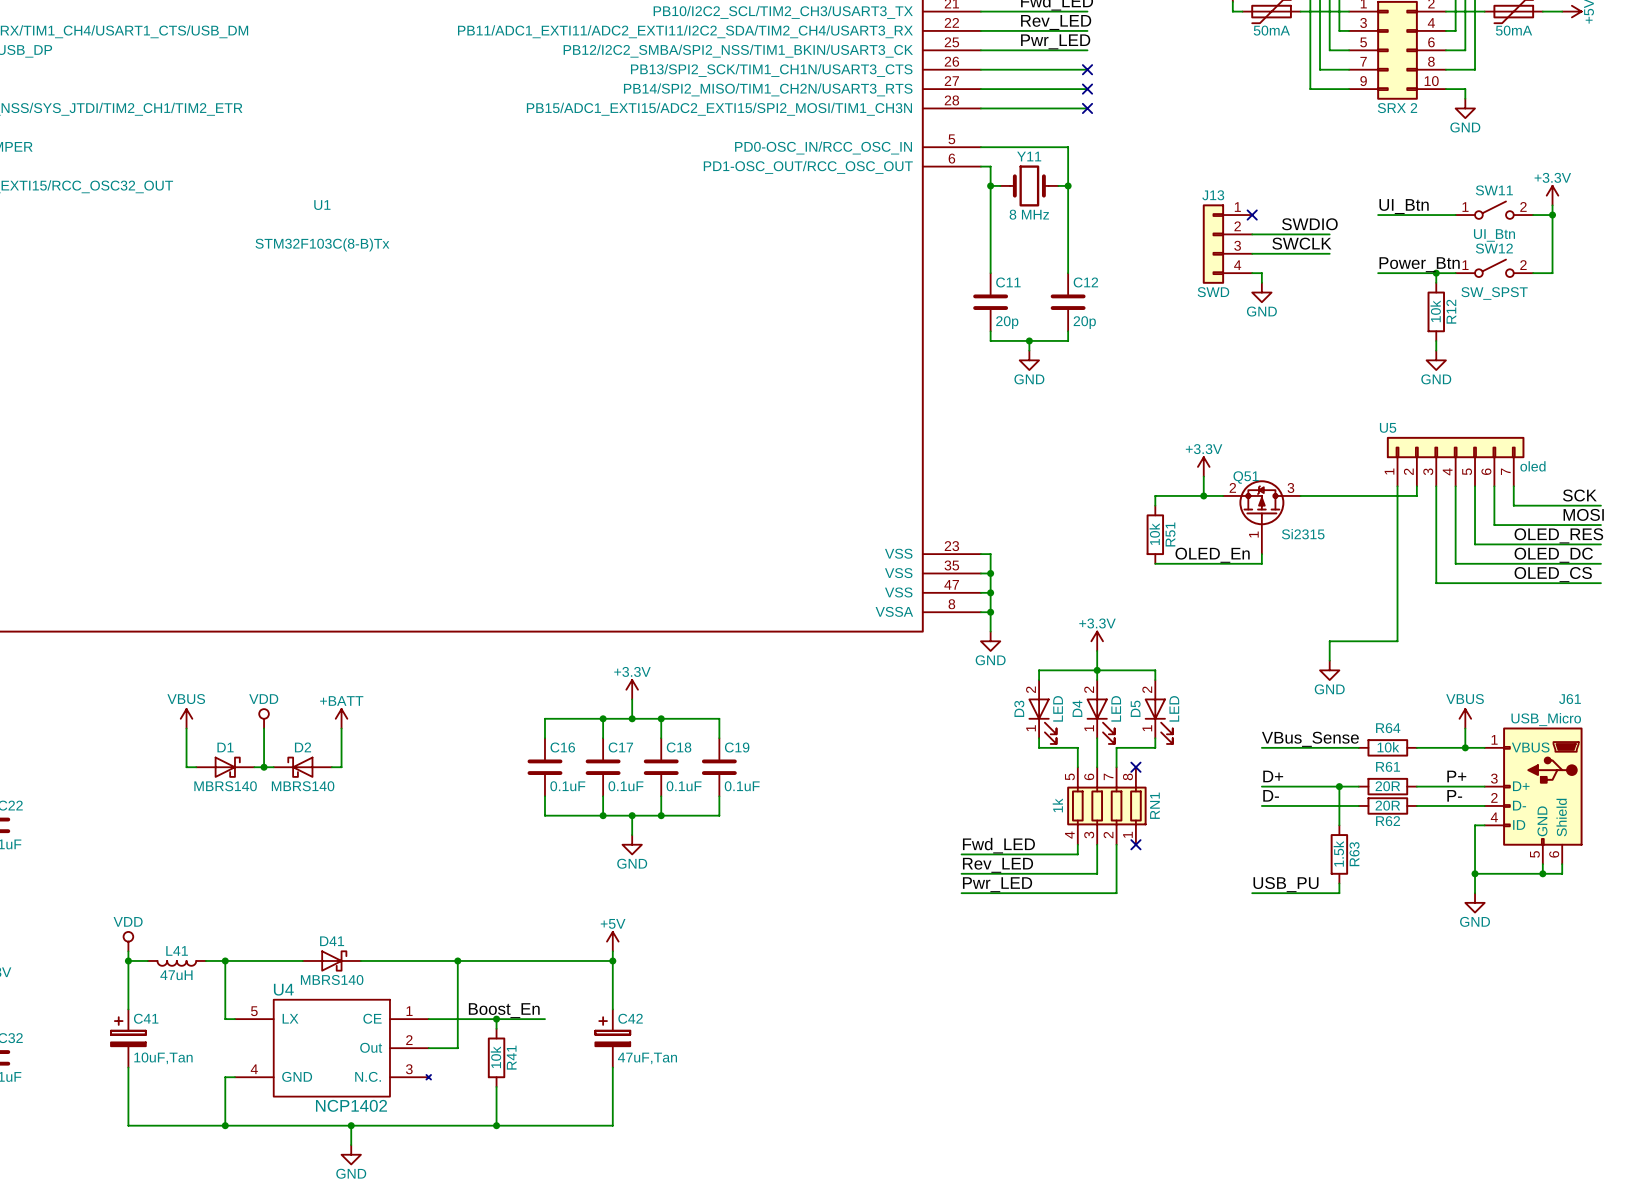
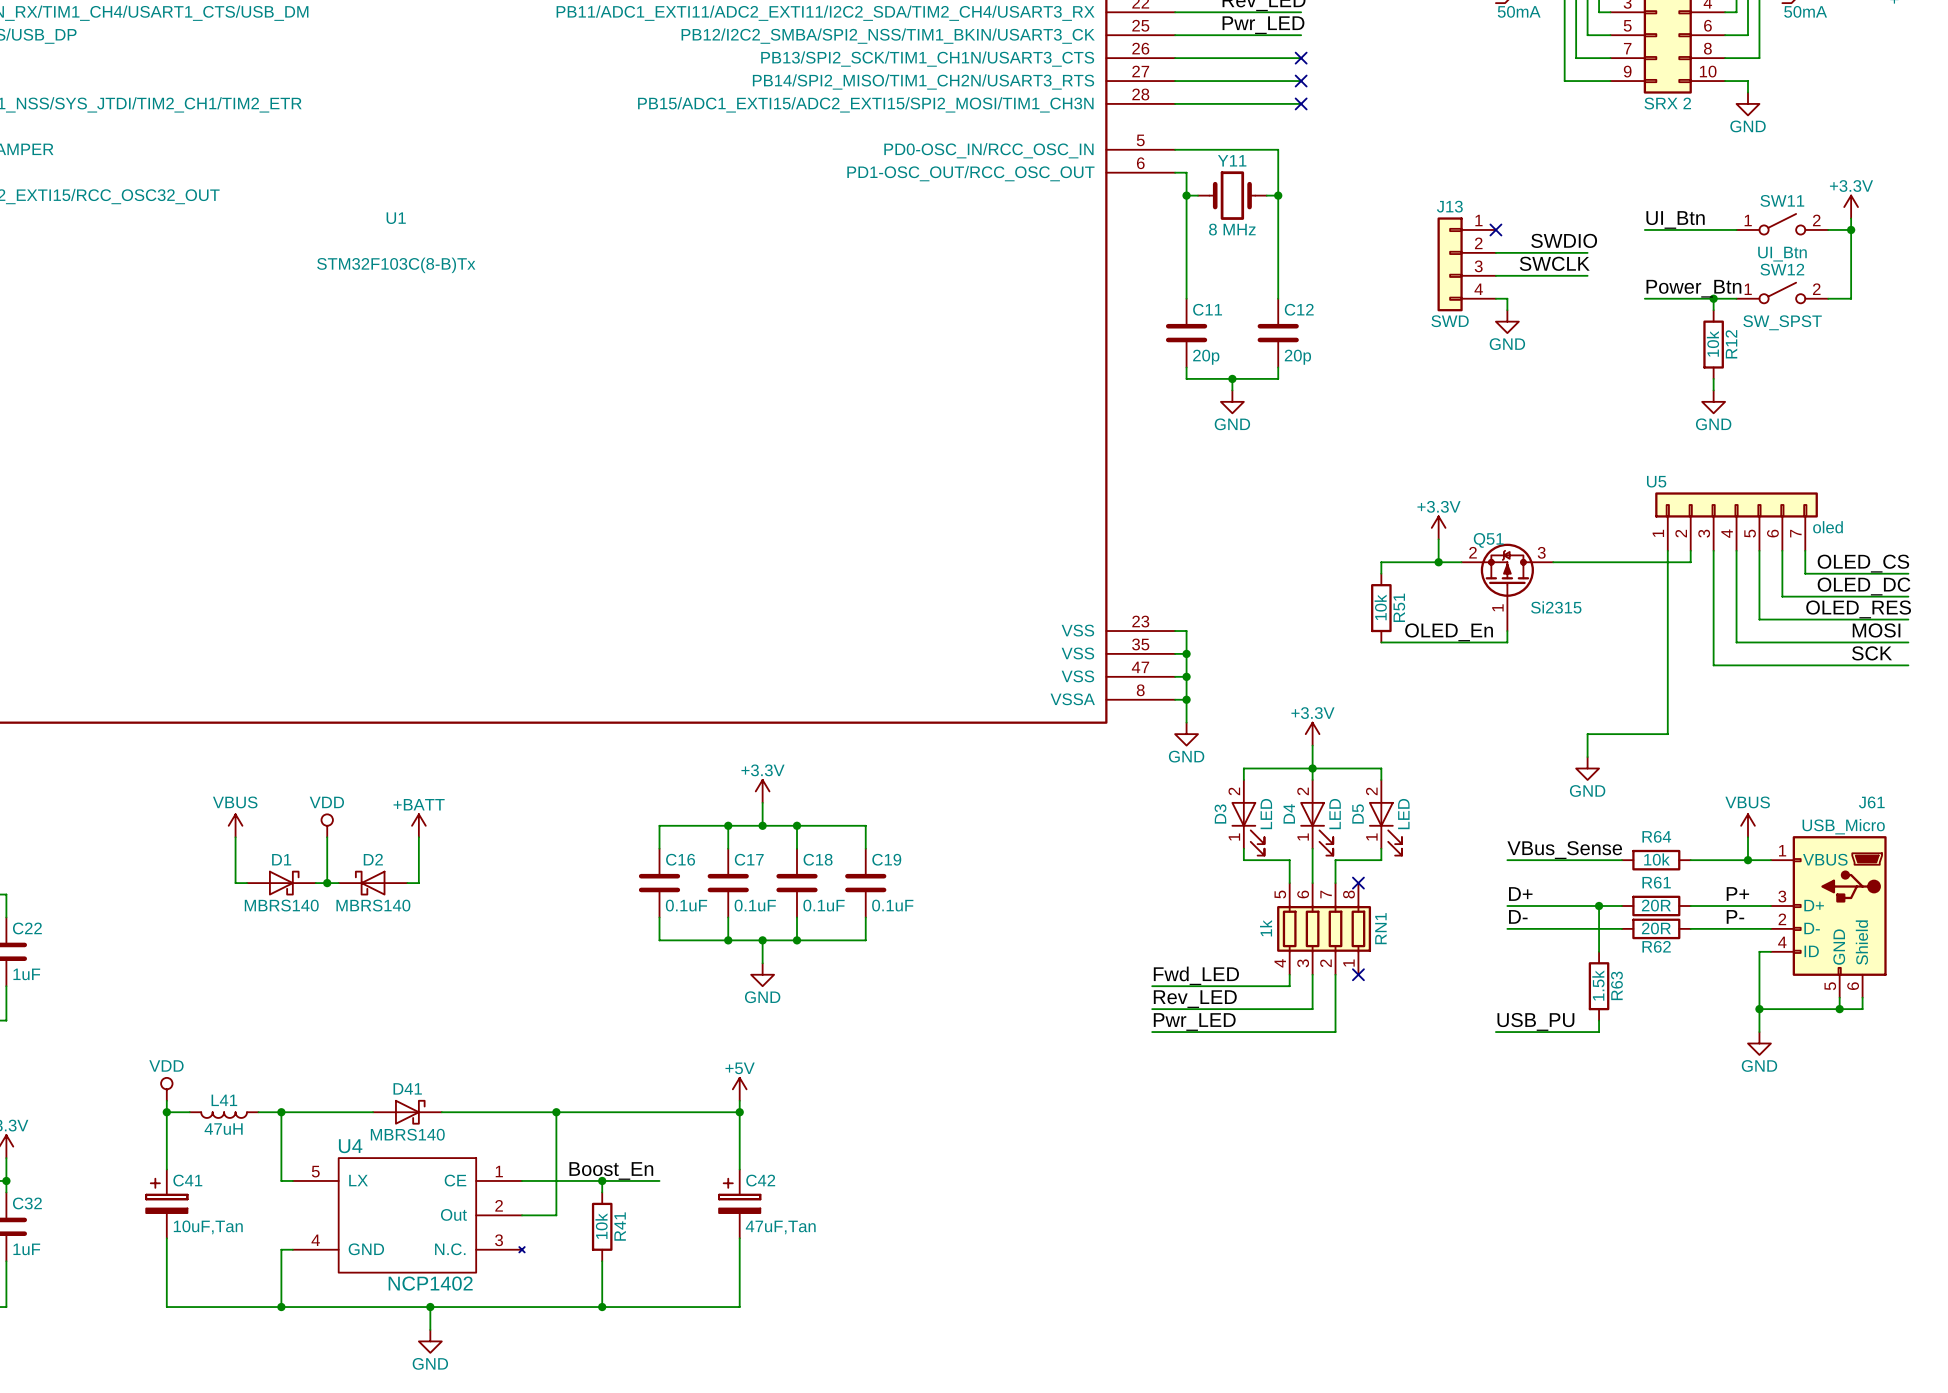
label position: SCK (1579, 495) -> SCK (1872, 653)
label position: MOSI (1583, 514) -> MOSI (1876, 630)
label position: OLED_DC (1553, 555) -> OLED_DC (1864, 586)
label position: OLED_CS (1553, 574) -> OLED_CS (1863, 563)

